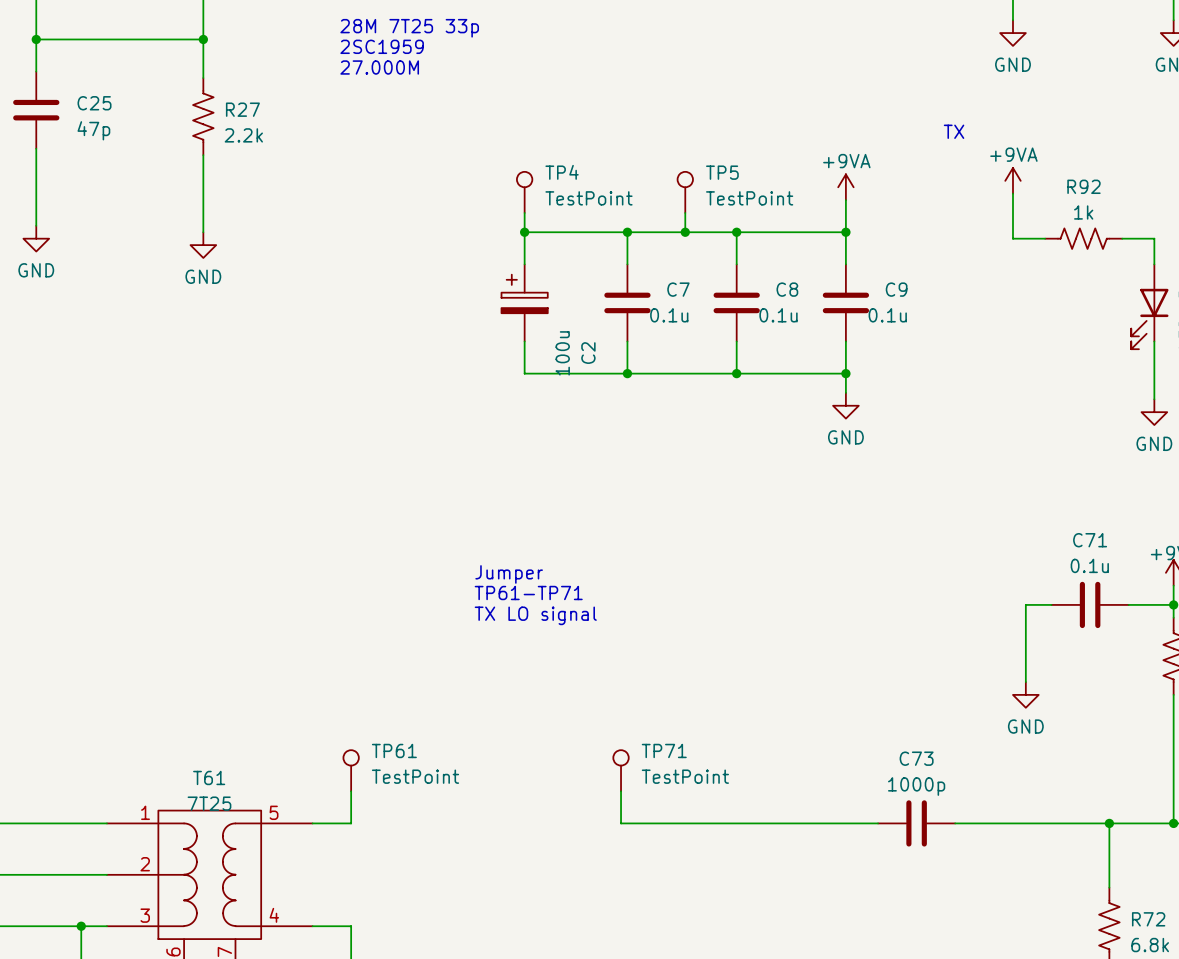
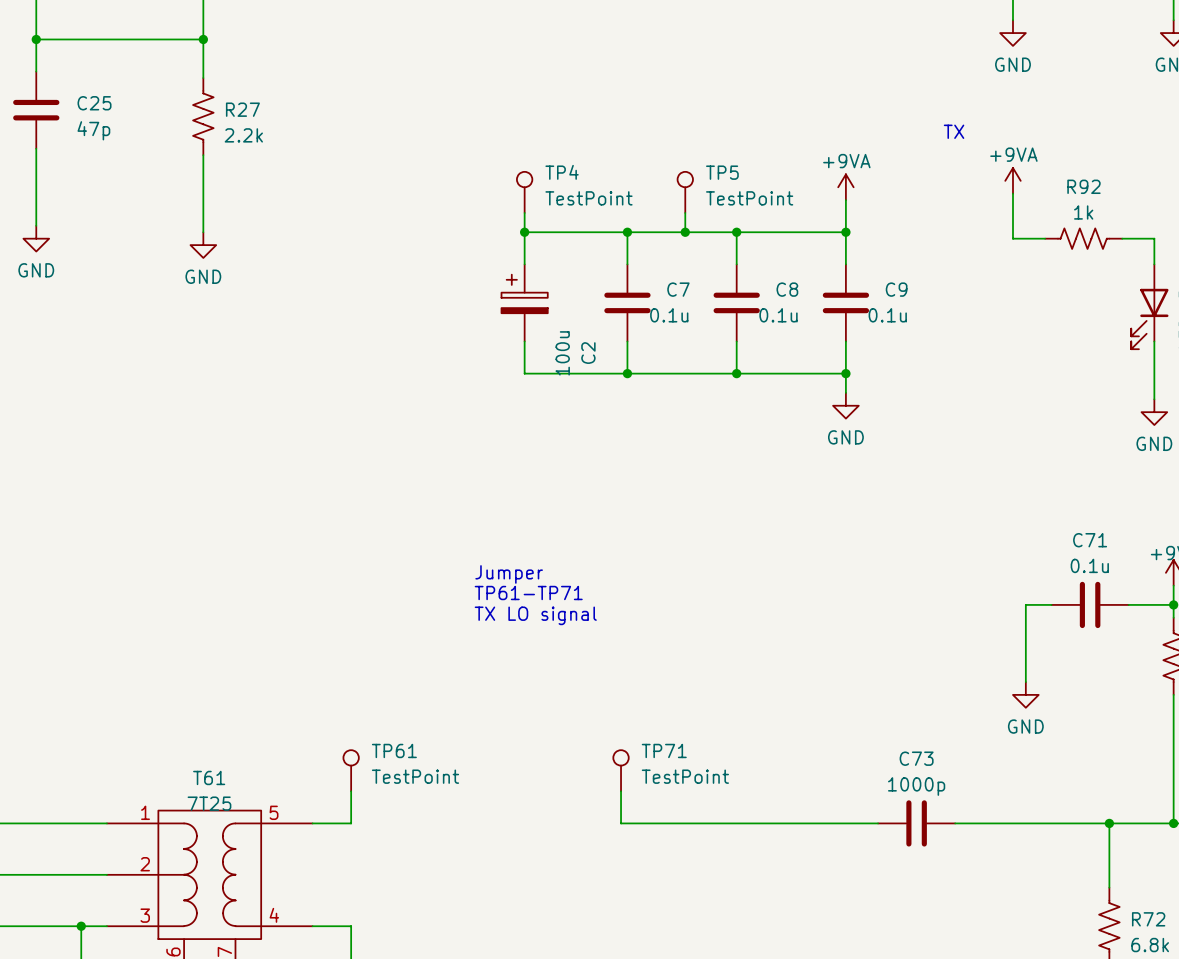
text: 28M 7T25 33p (409, 28) -> none
text: 2SC1959 (382, 46) -> none
text: 27.000M (379, 67) -> none

